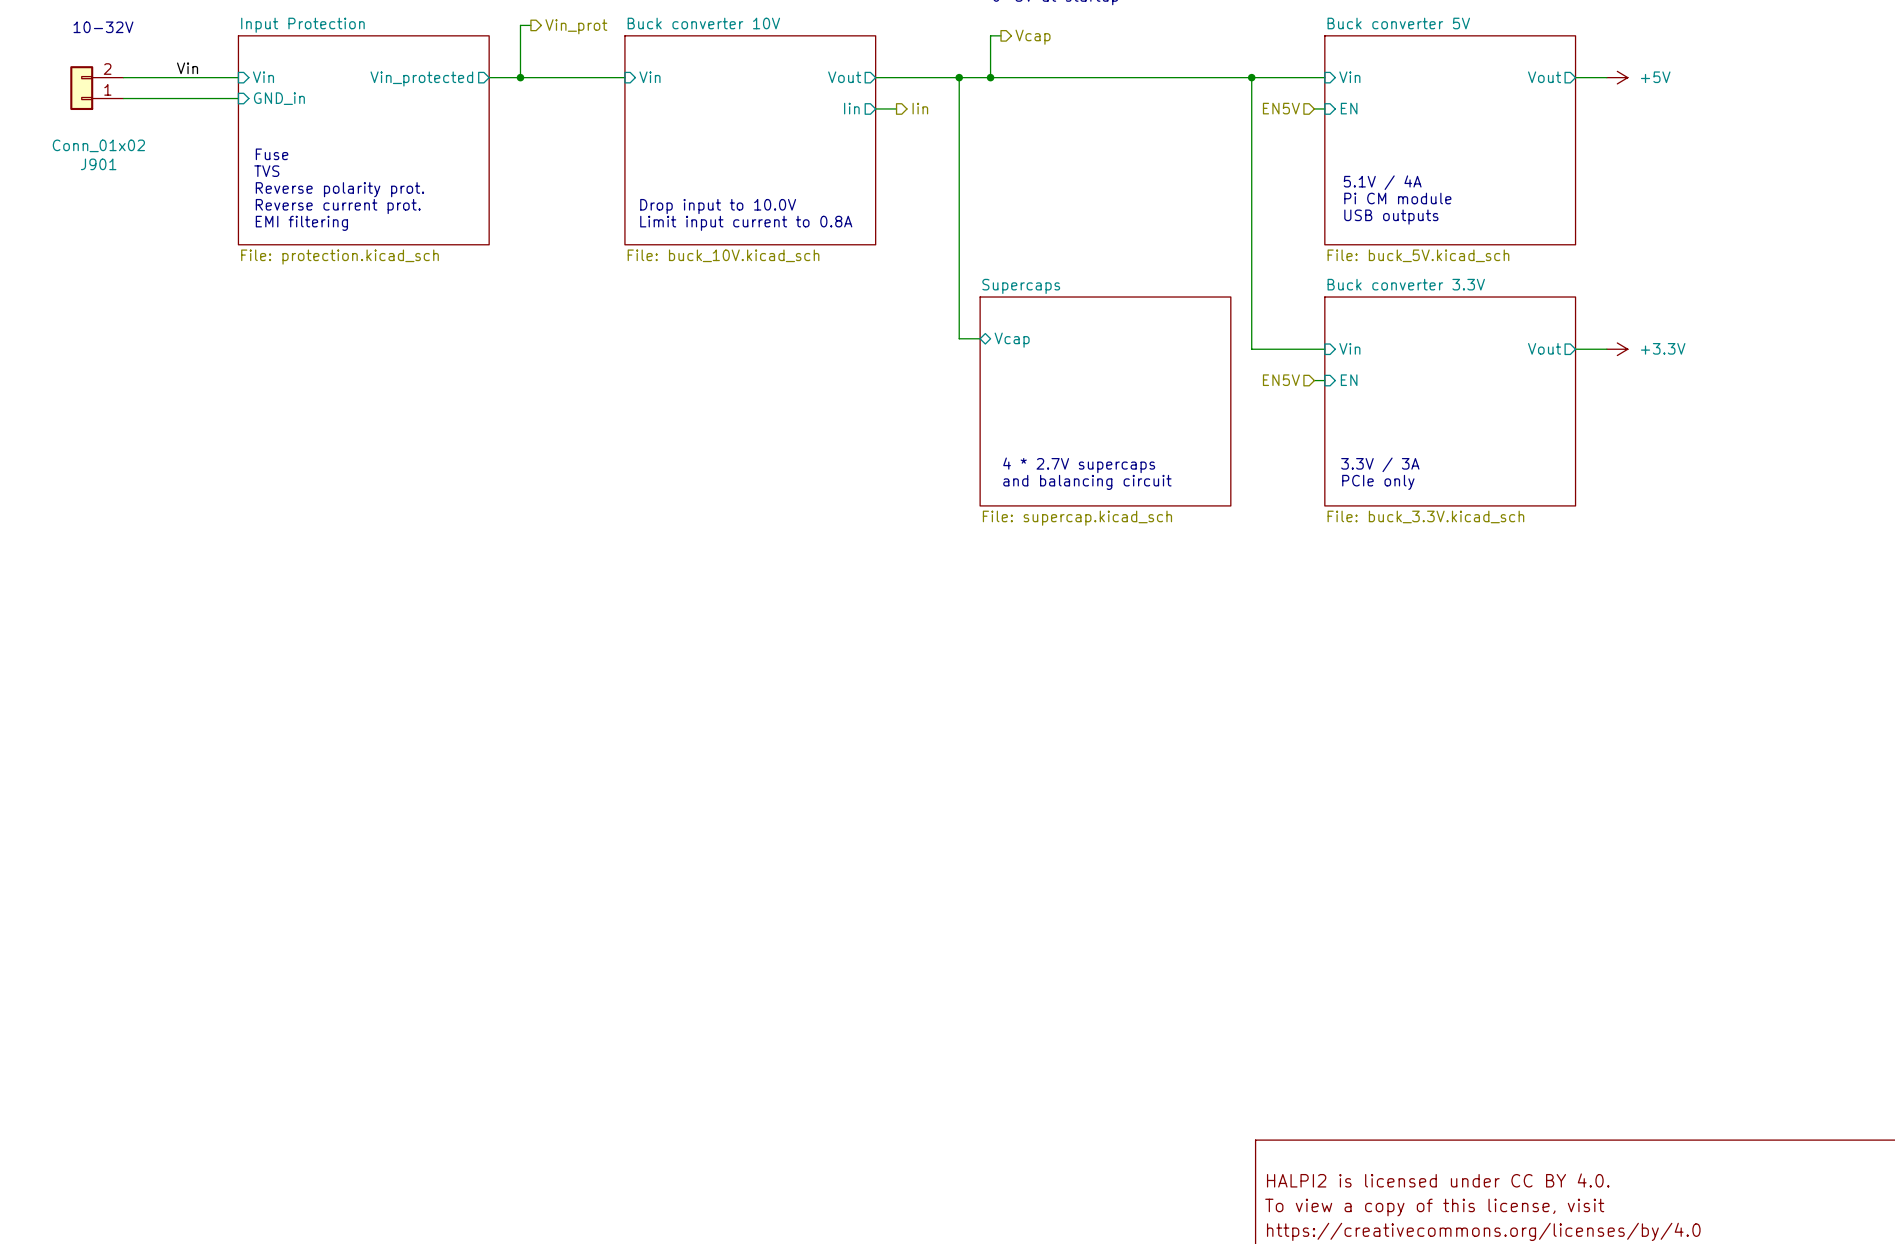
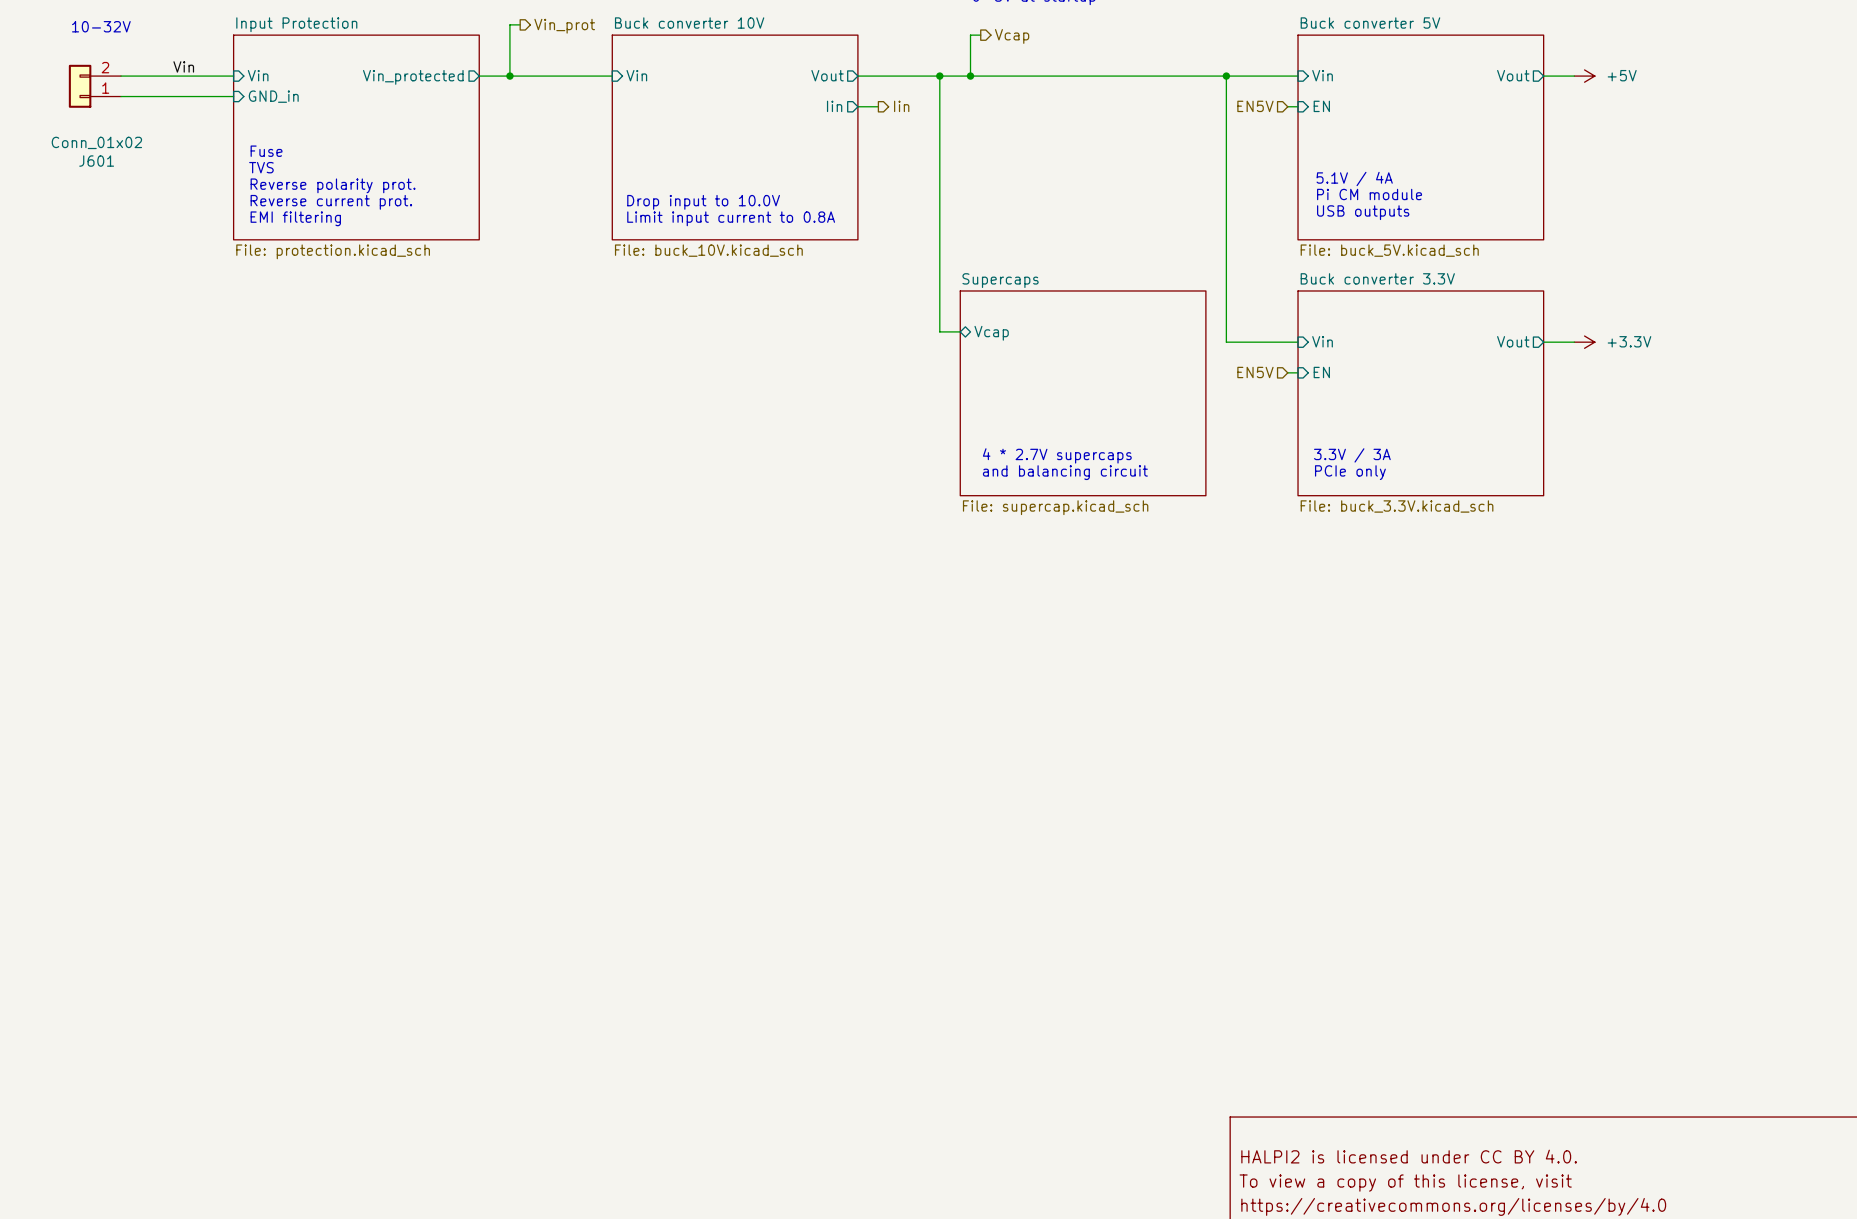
J901 name: J901 (98, 164) -> J601 (96, 161)

